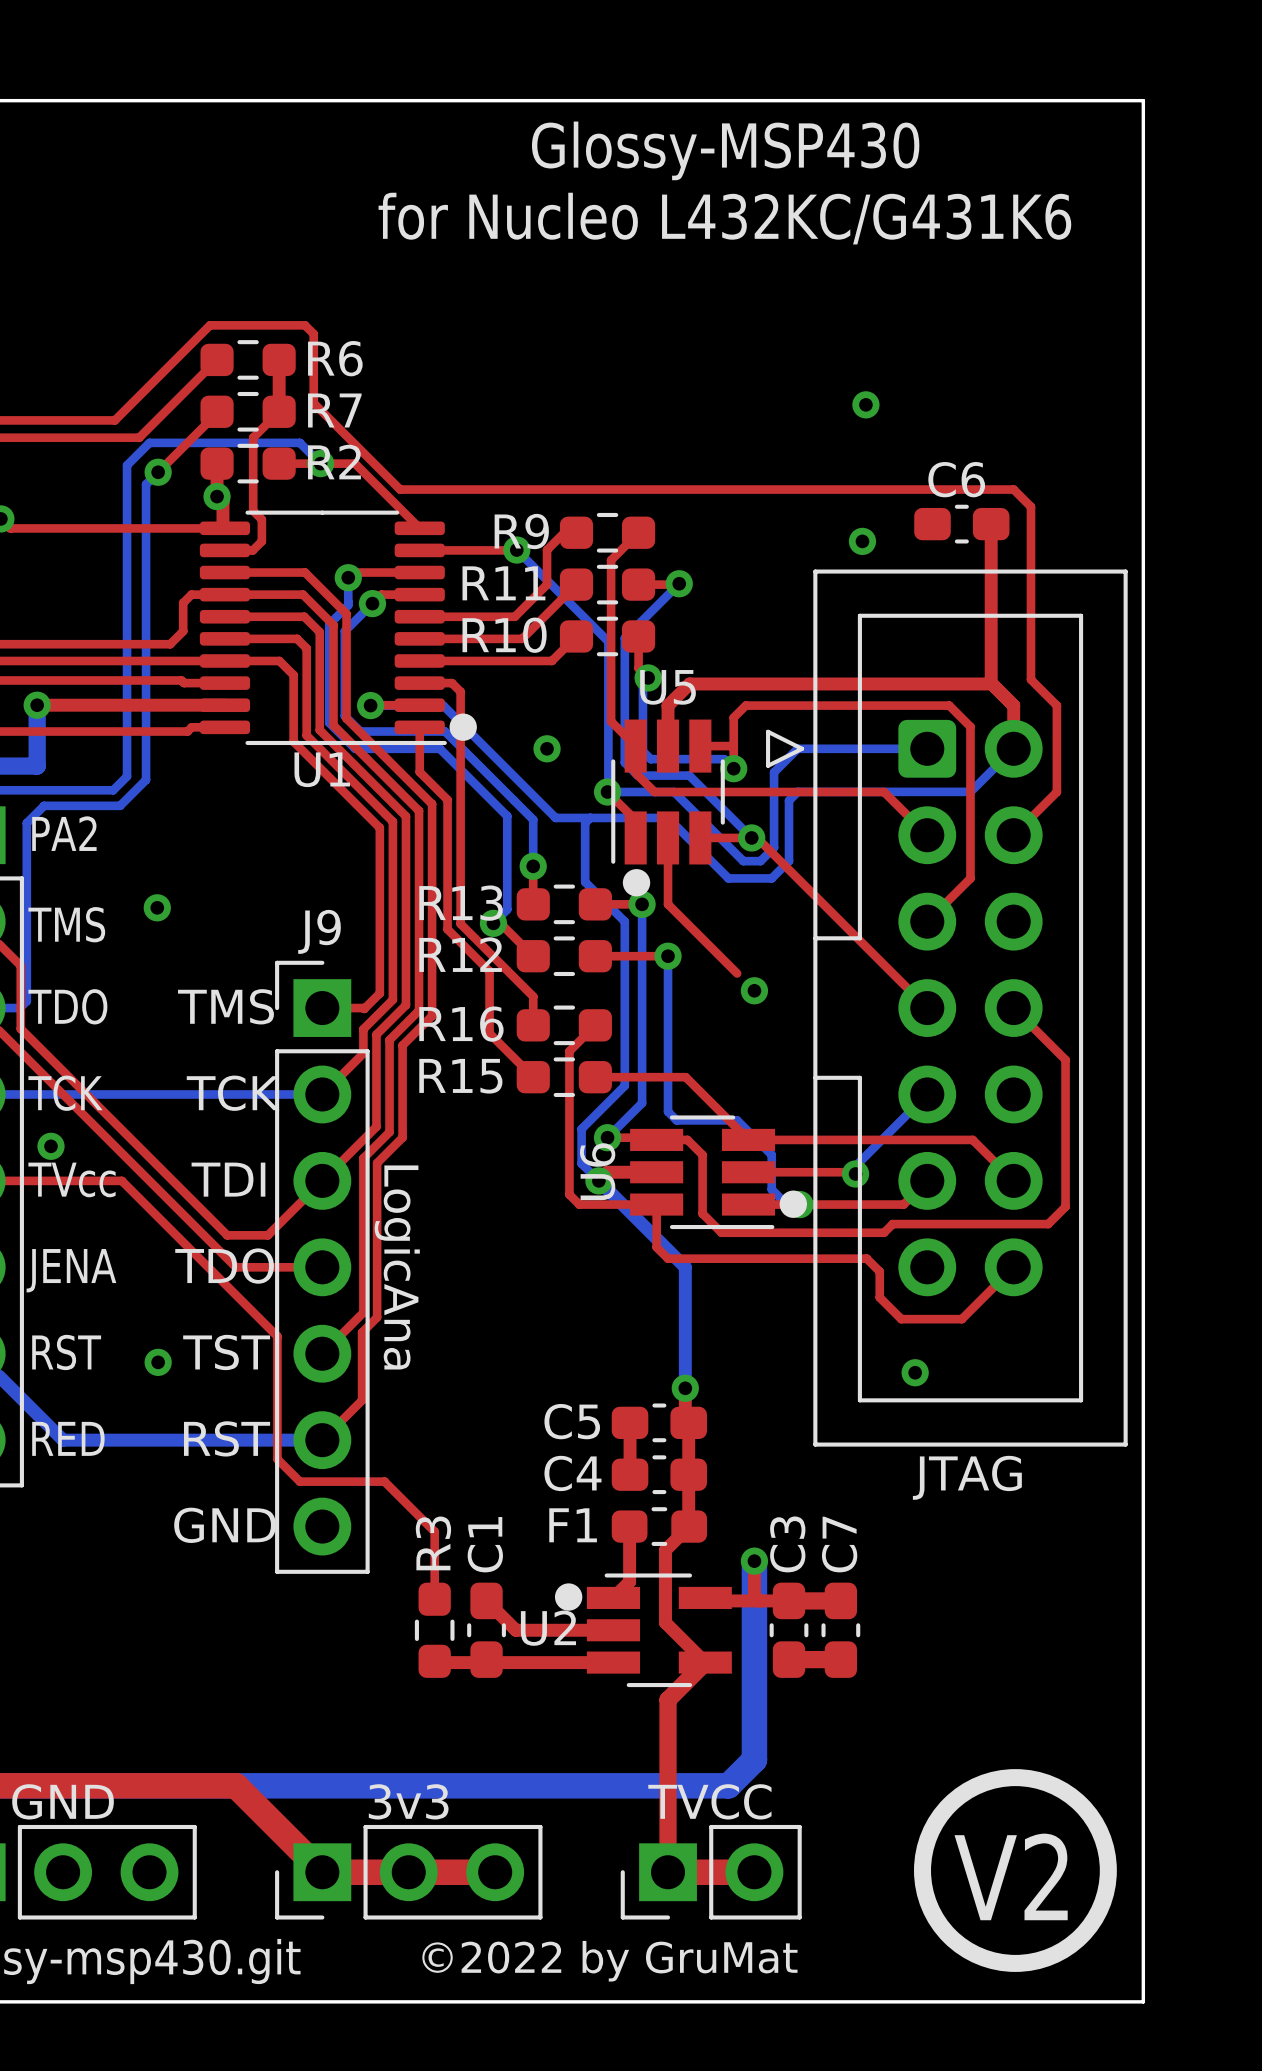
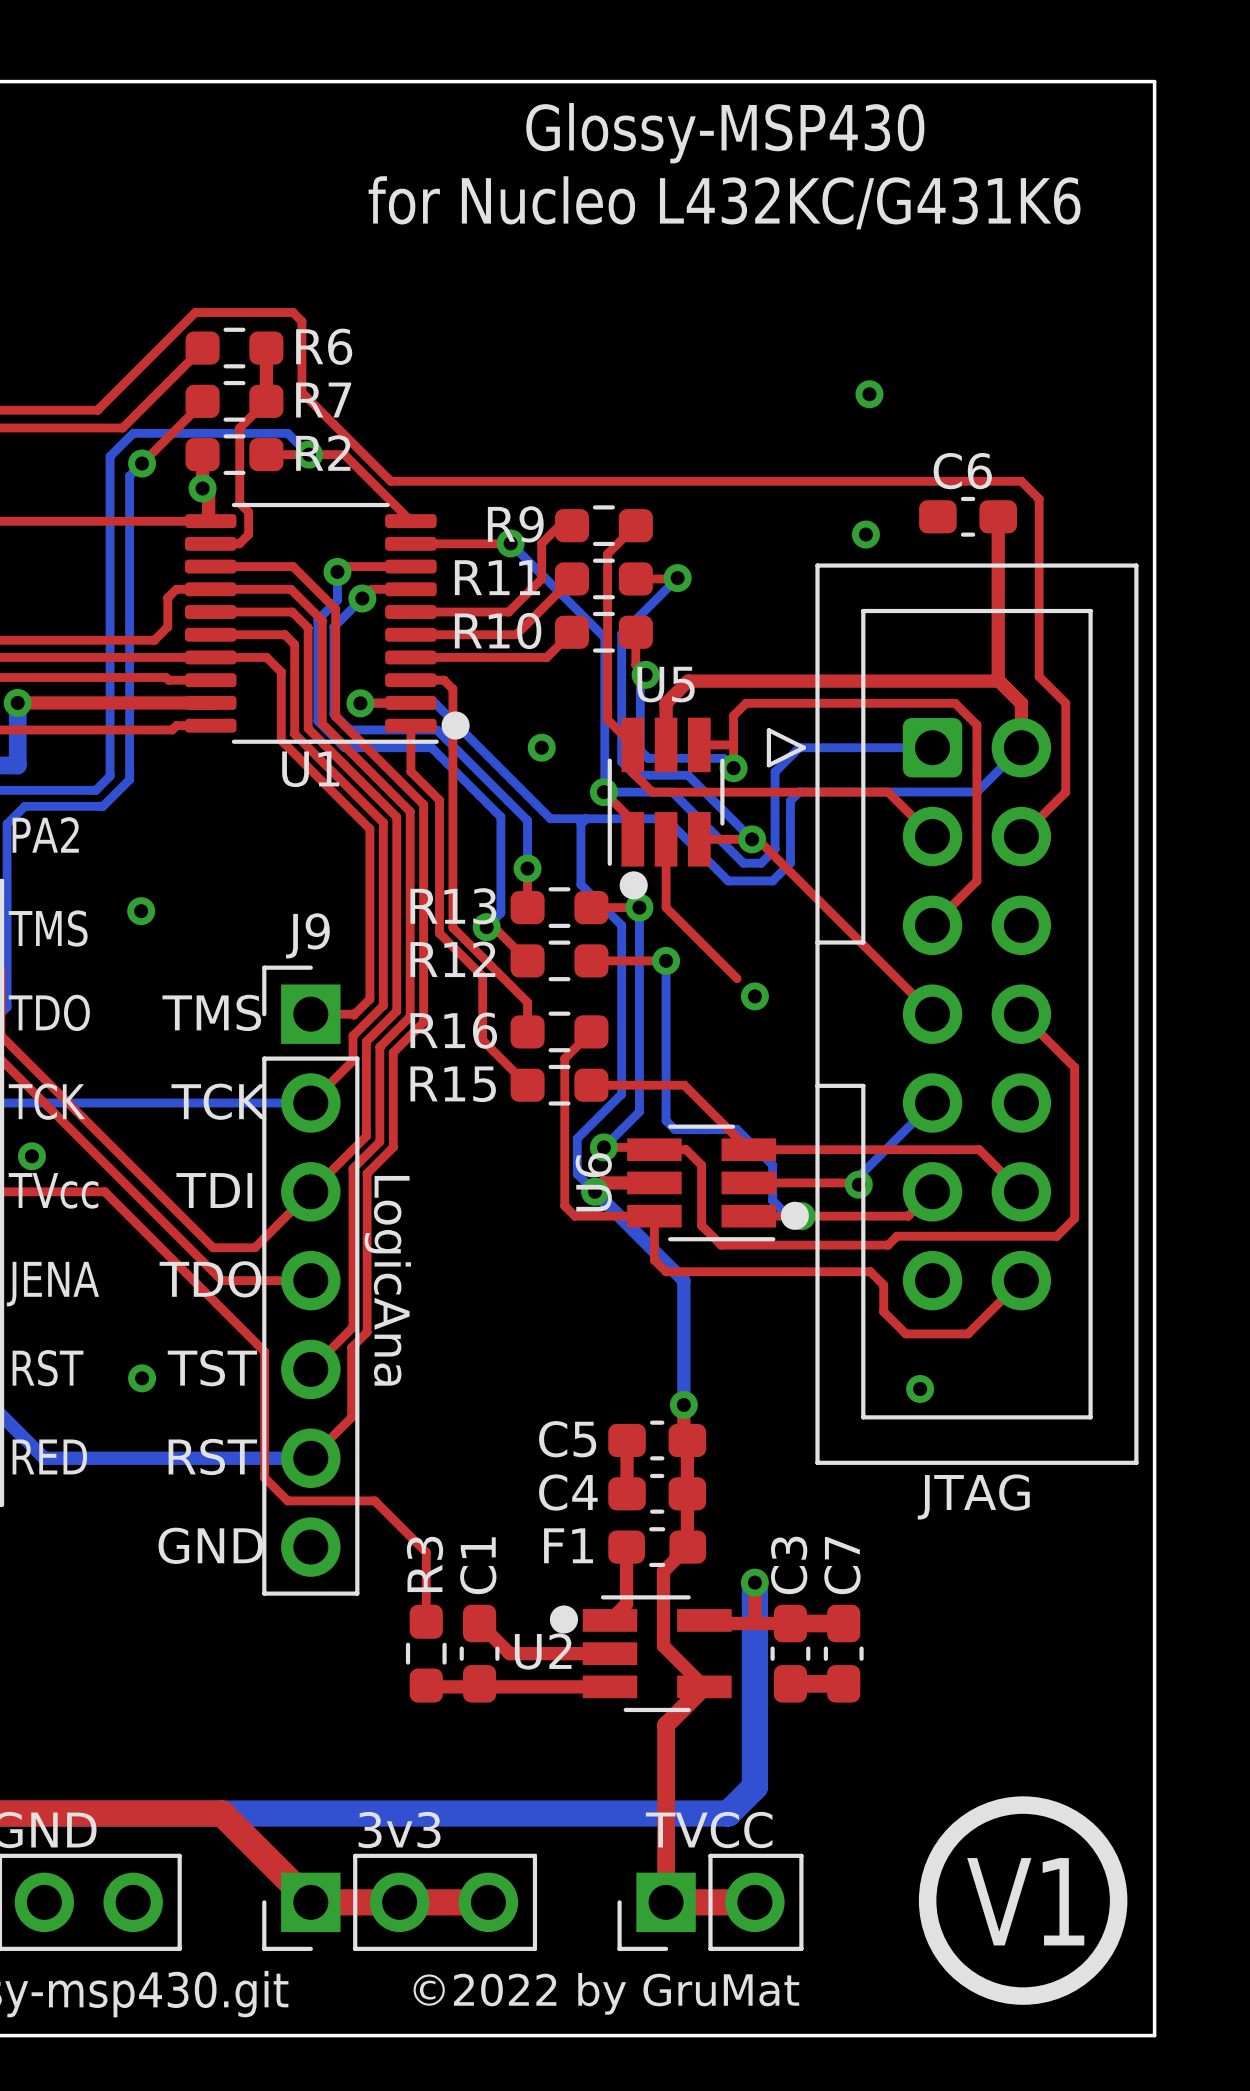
text: V2 (1011, 1876) -> V1 (1025, 1901)

